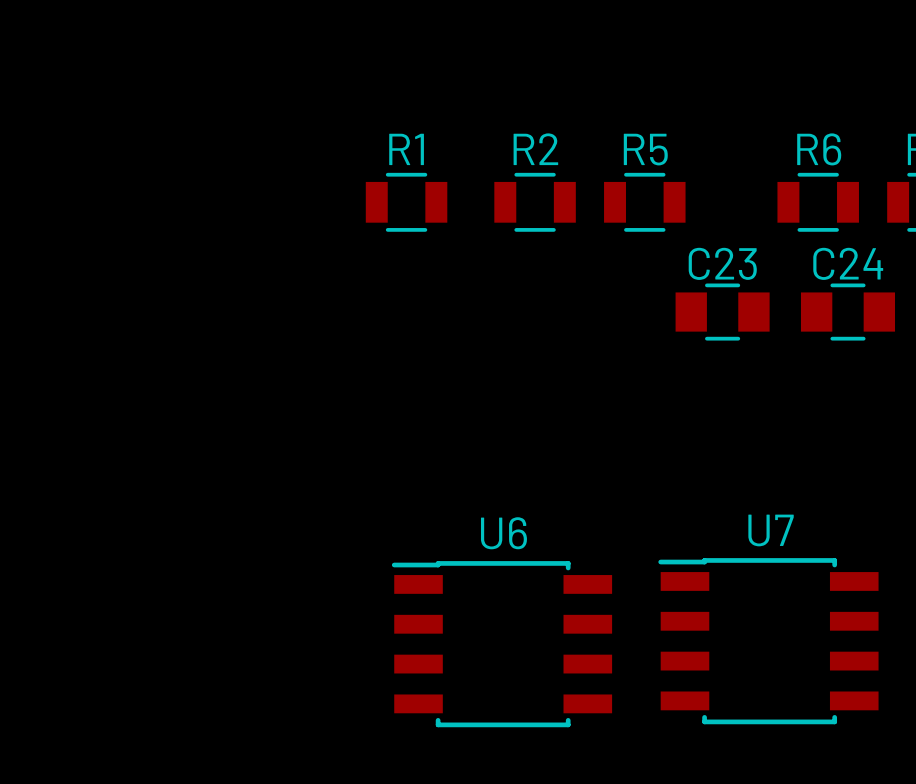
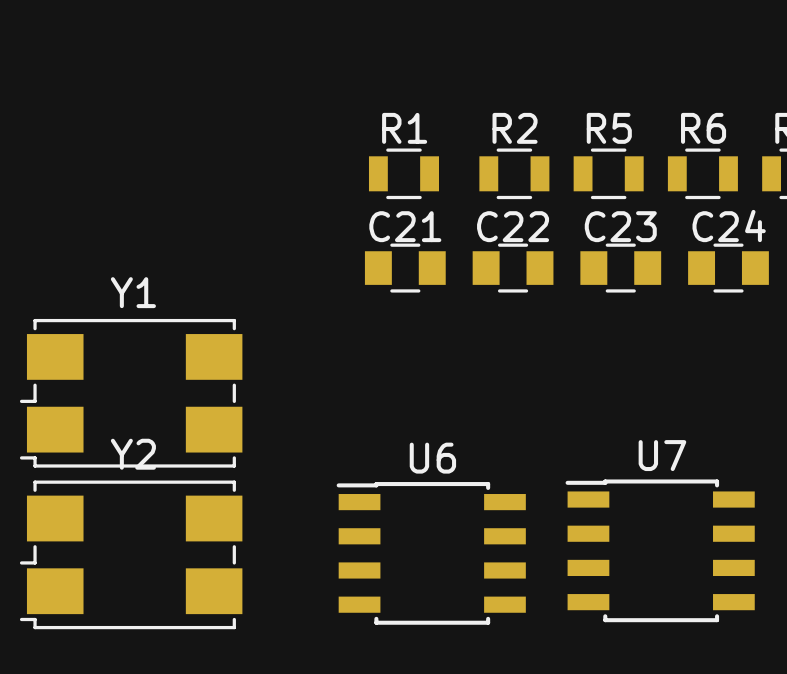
R1 position: (406, 202) -> (403, 173)
R2 position: (535, 202) -> (514, 173)
R5 position: (644, 202) -> (608, 173)
C21: none -> (405, 268)
C22: none -> (513, 268)
Y1: none -> (131, 393)
Y2: none -> (131, 554)

